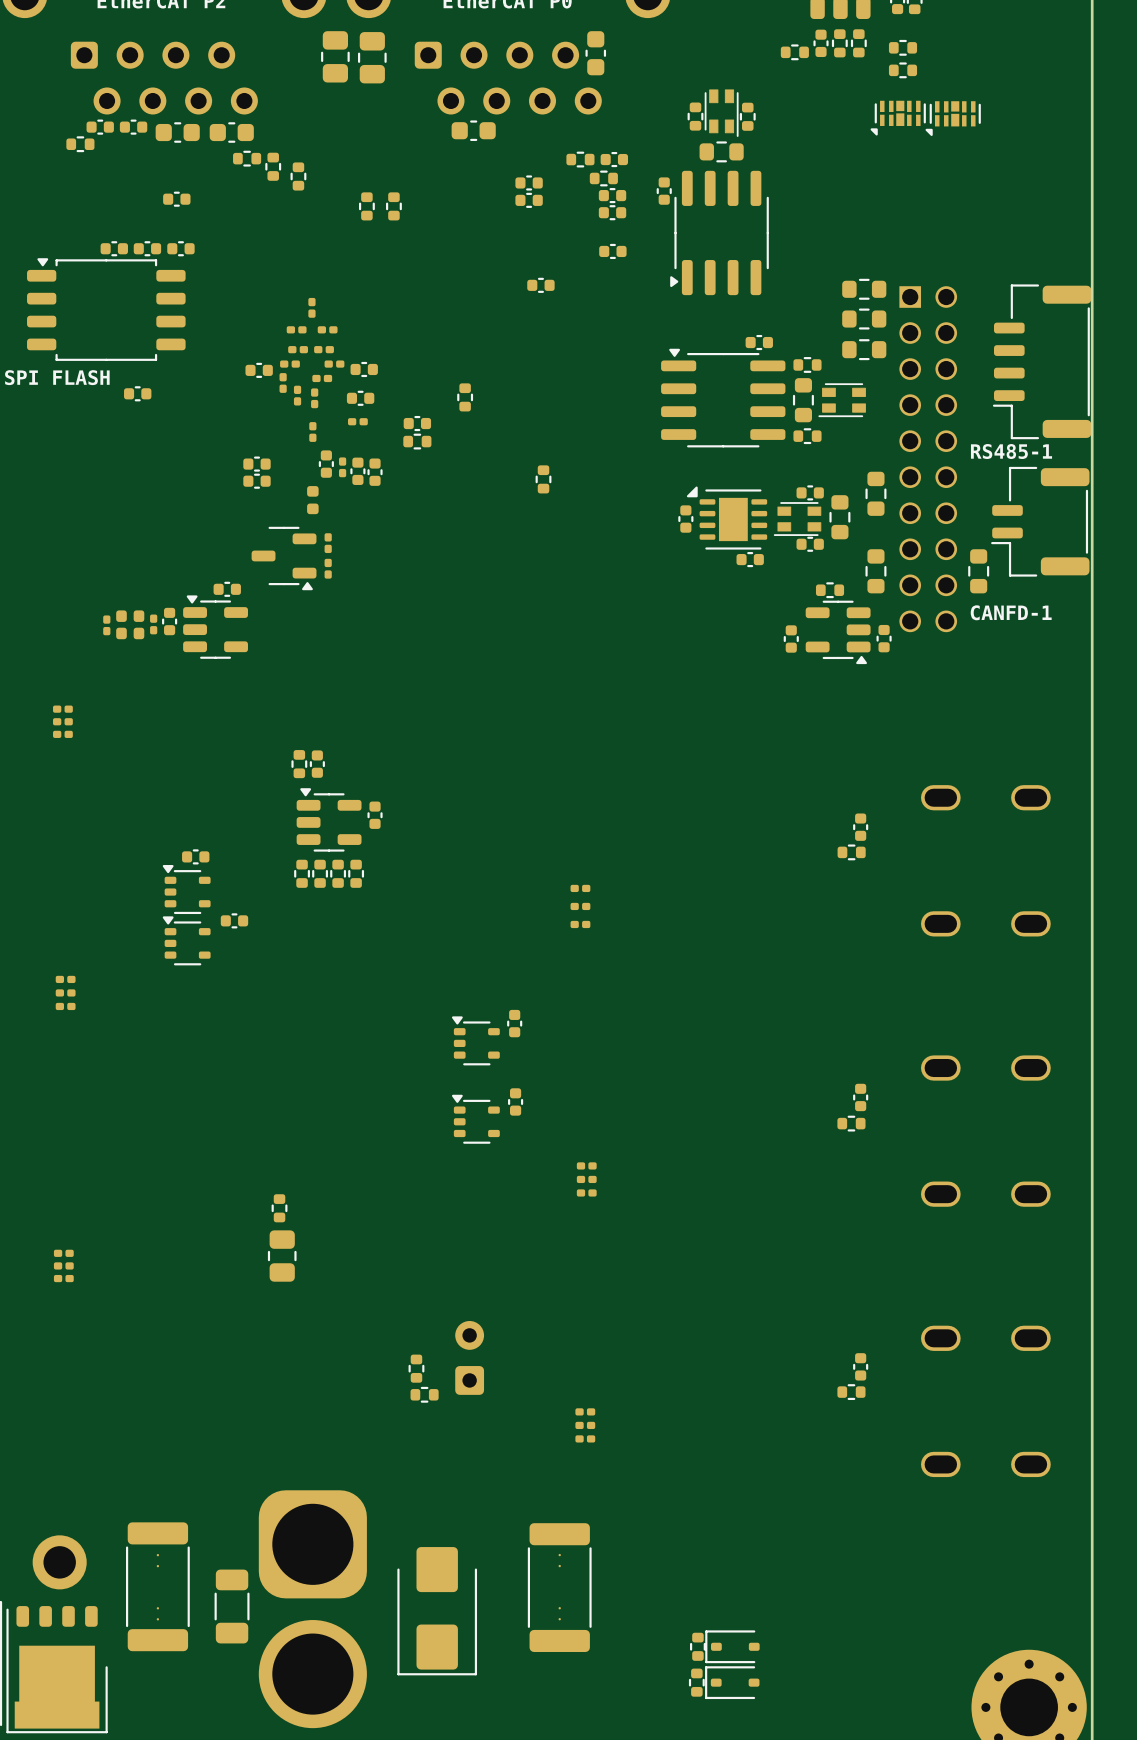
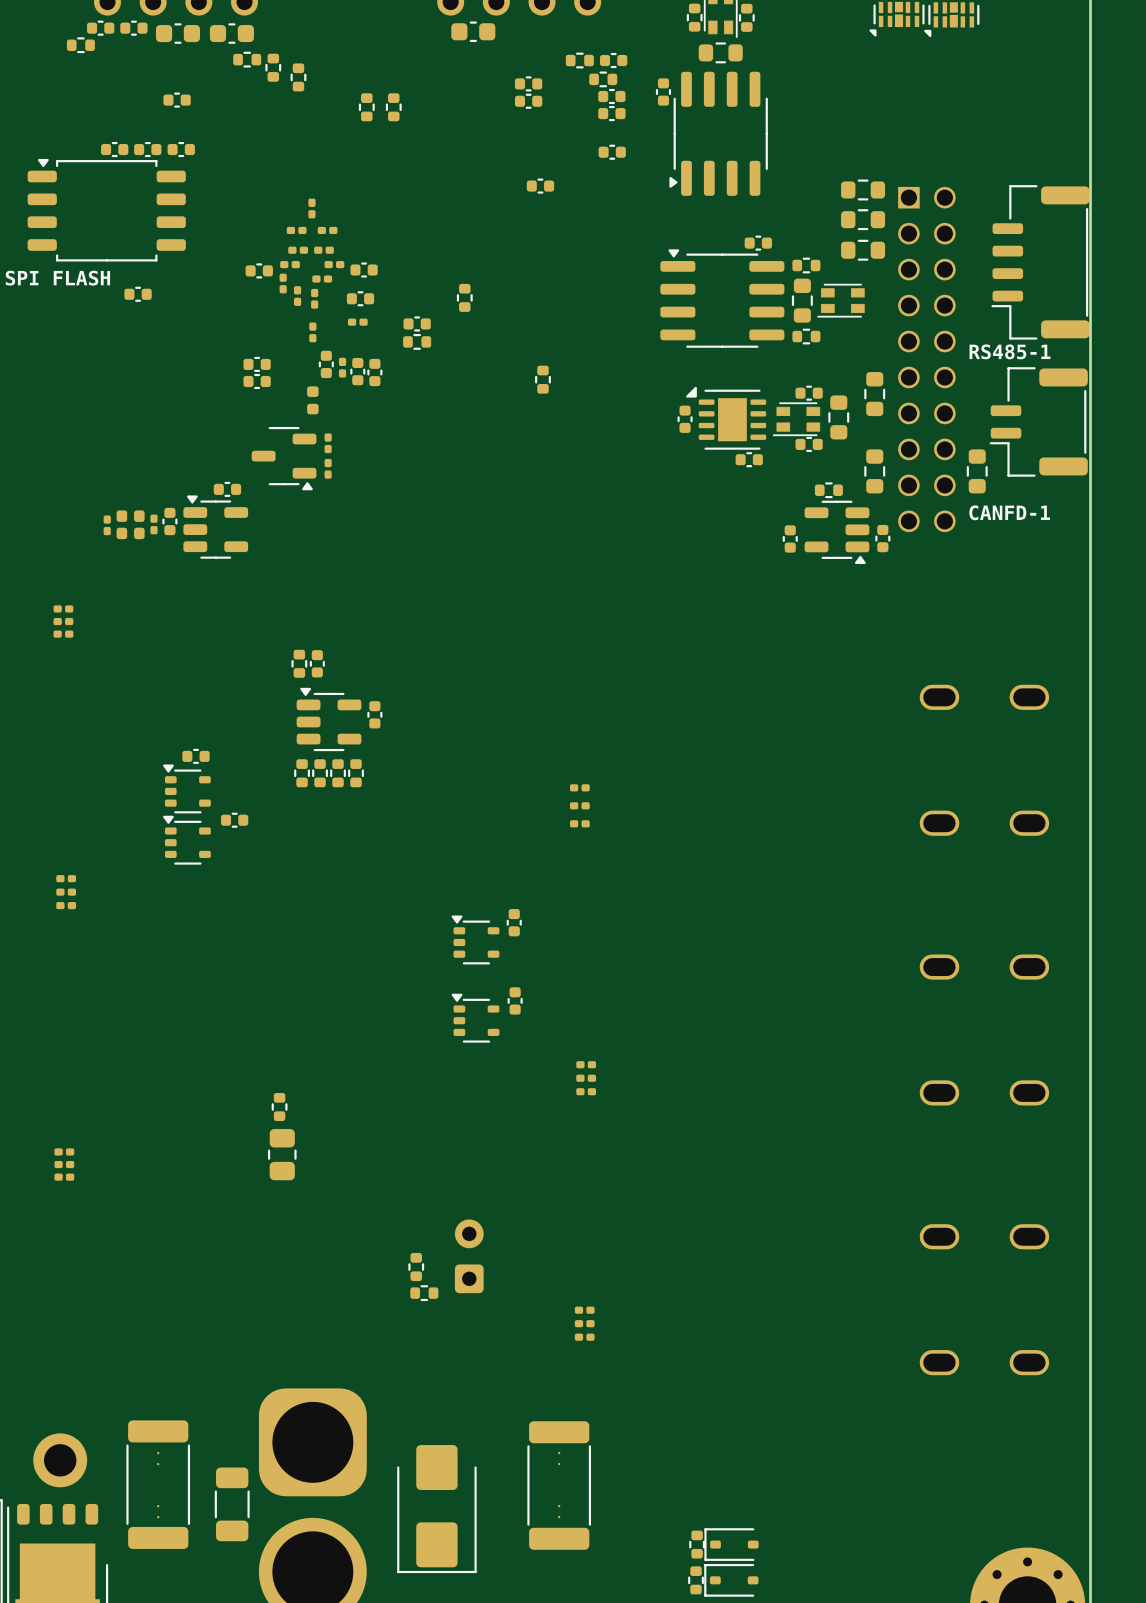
part: (860, 827) -> none
part: (851, 852) -> none
part: (860, 1097) -> none
part: (851, 1123) -> none
part: (860, 1366) -> none
part: (851, 1392) -> none

